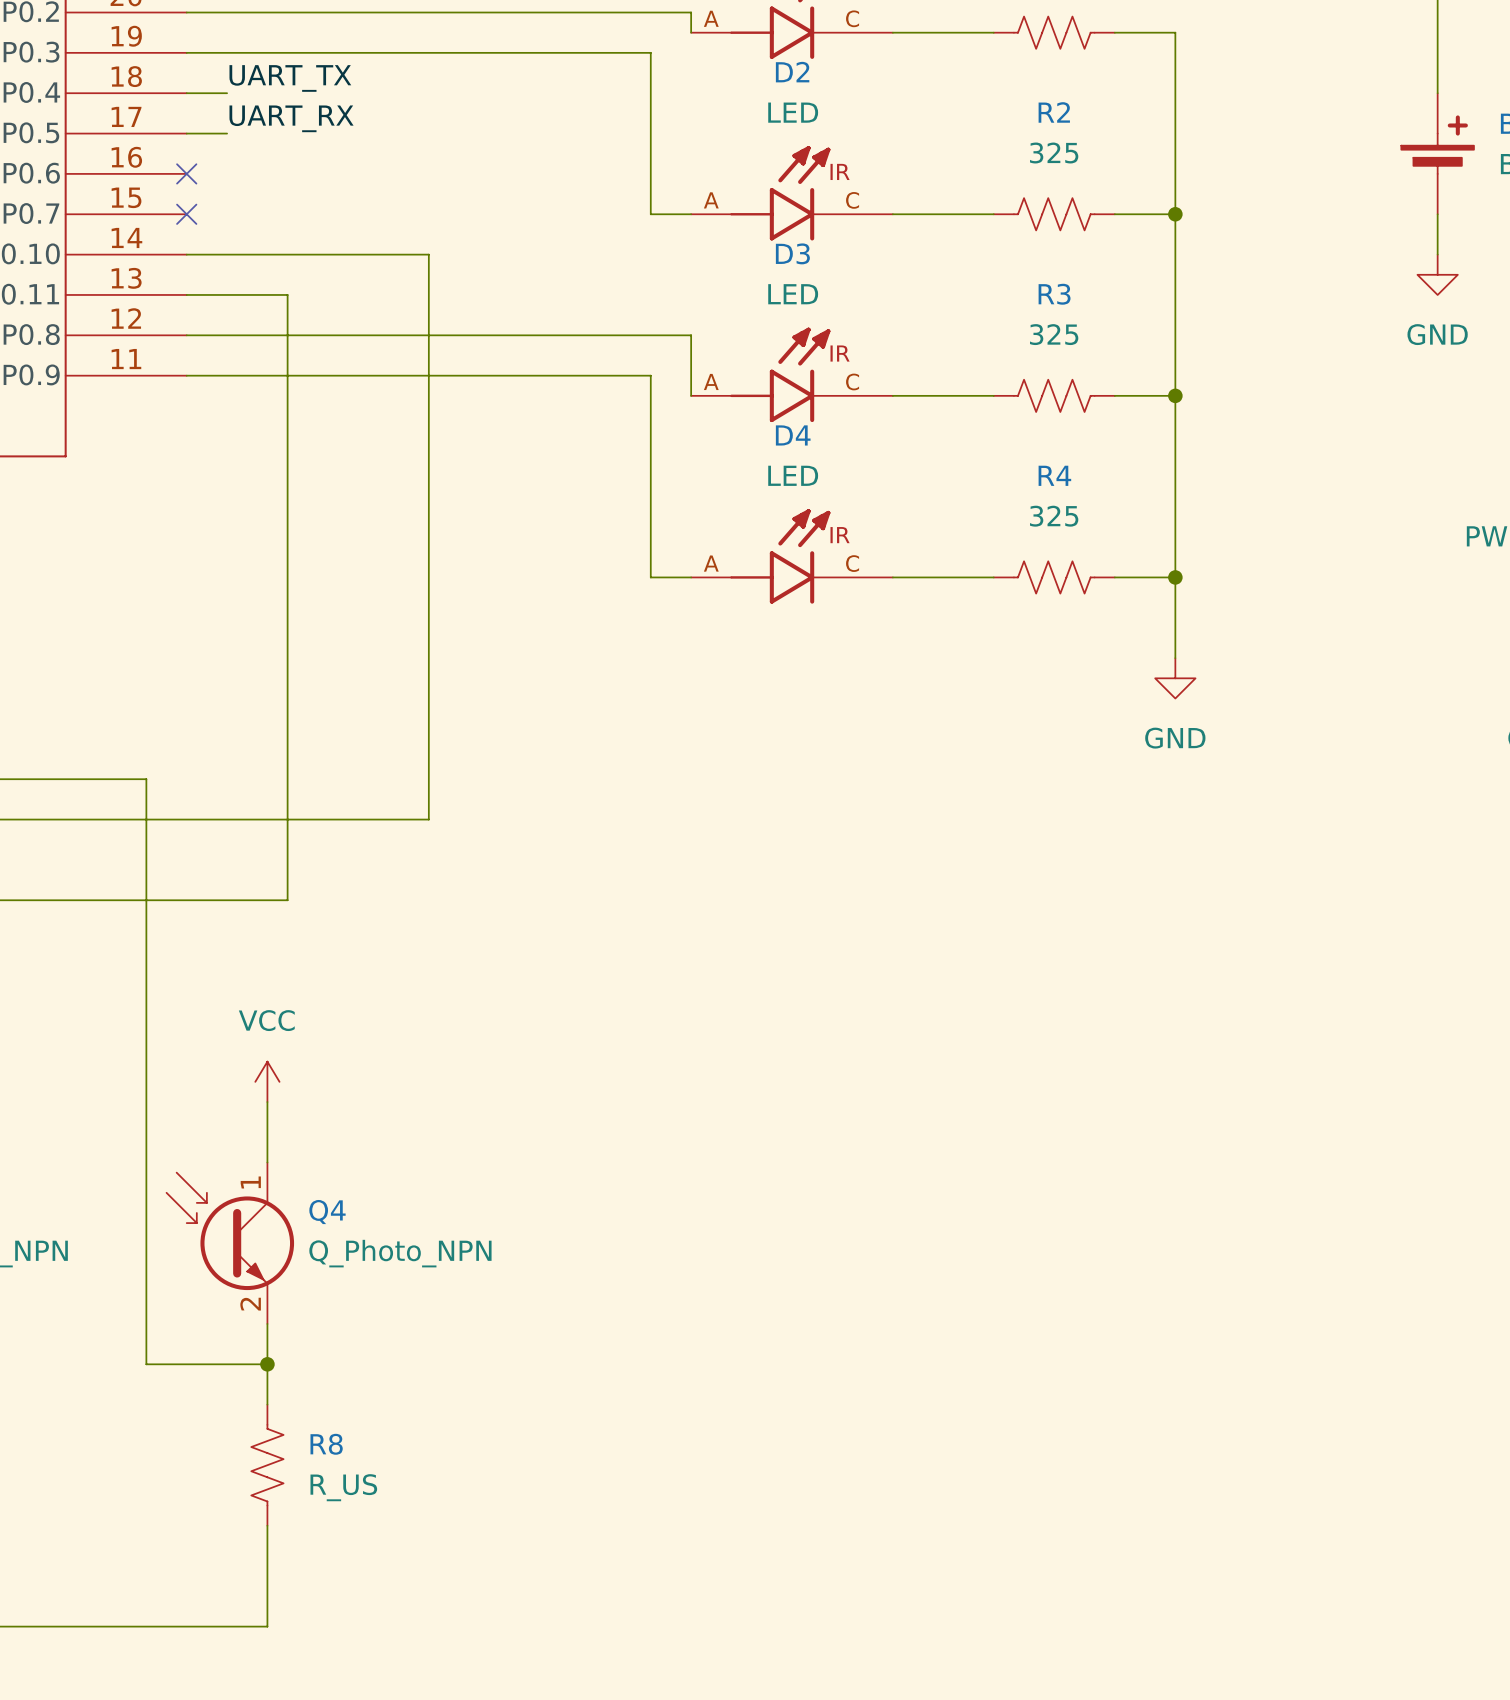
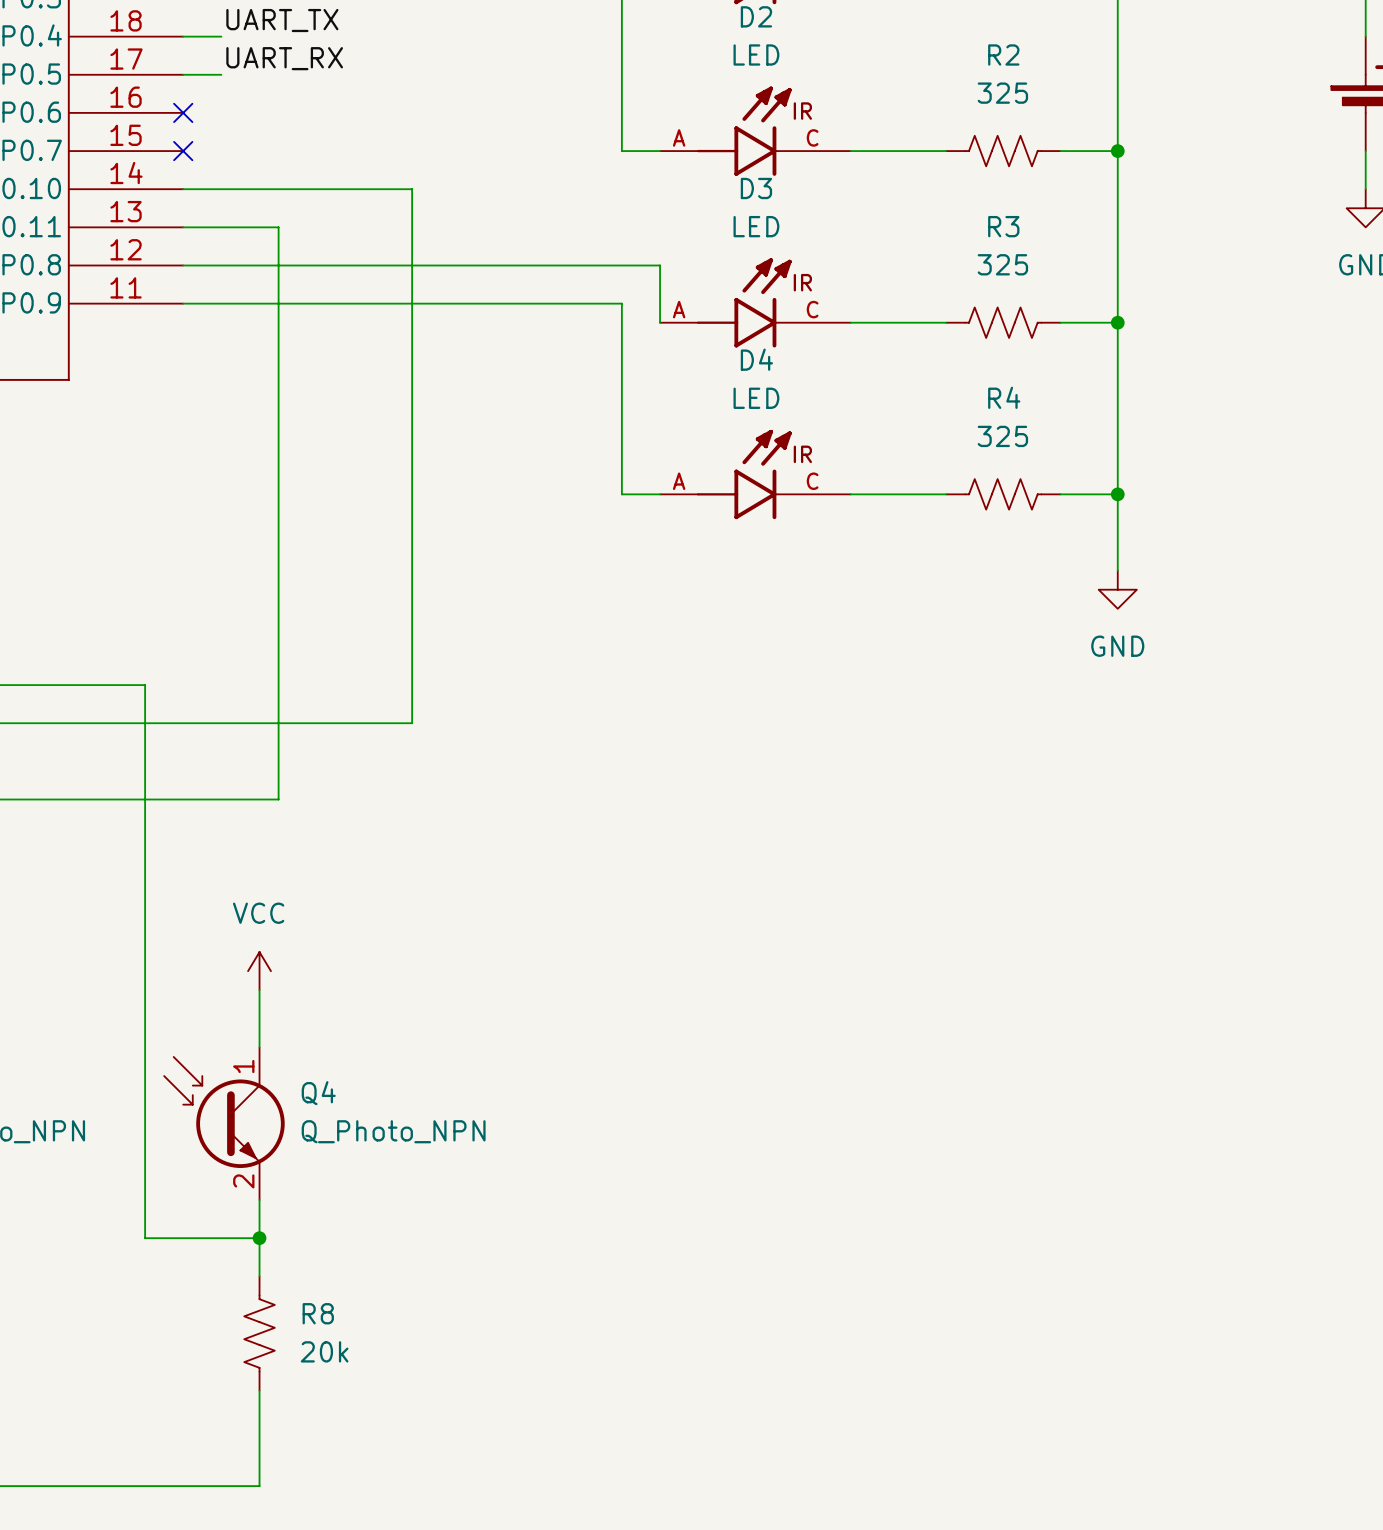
R8 value: R_US (343, 1487) -> 20k (324, 1351)

